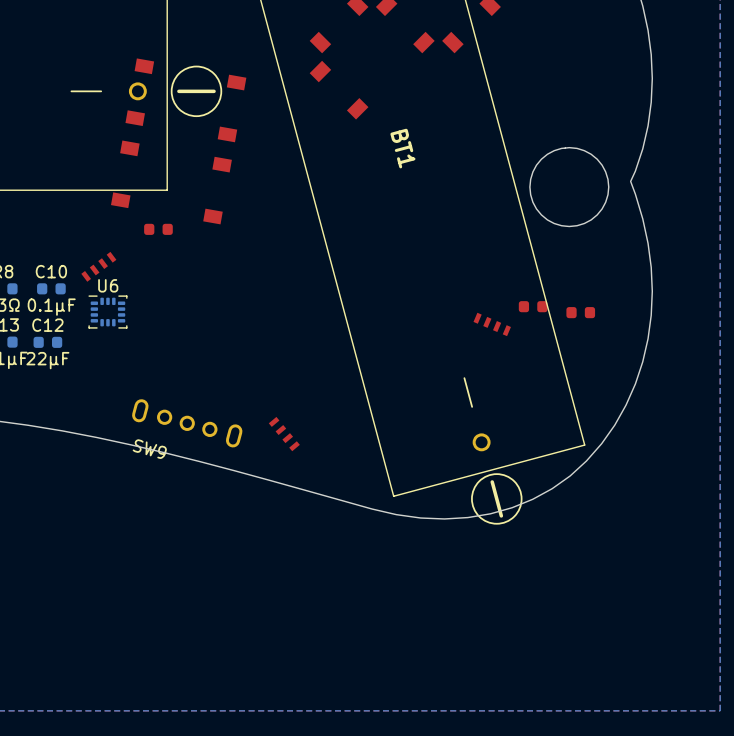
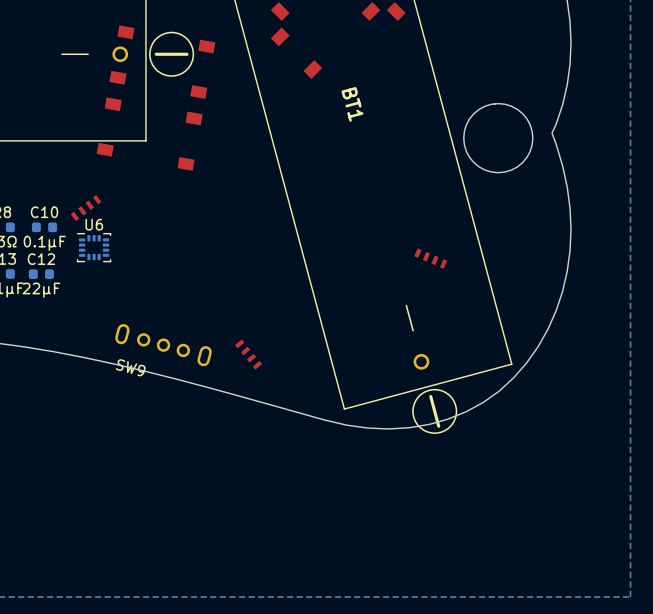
part: (158, 229) -> none
part: (533, 306) -> none
part: (580, 312) -> none

